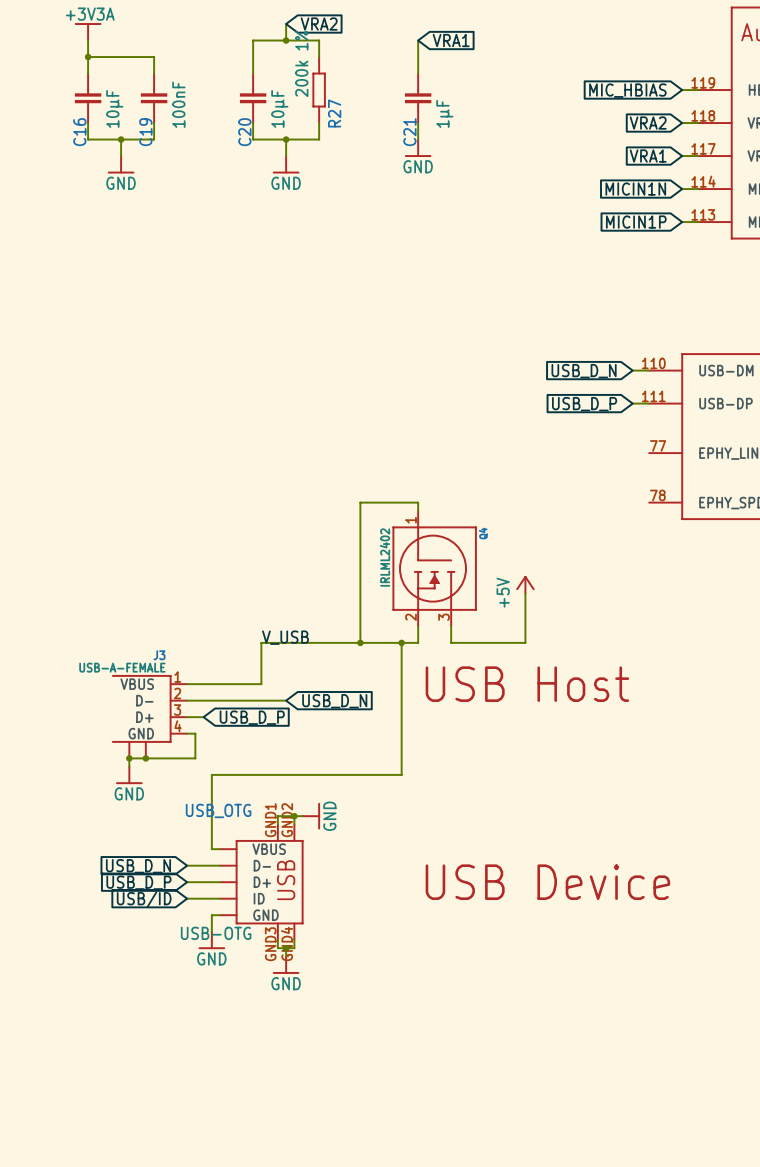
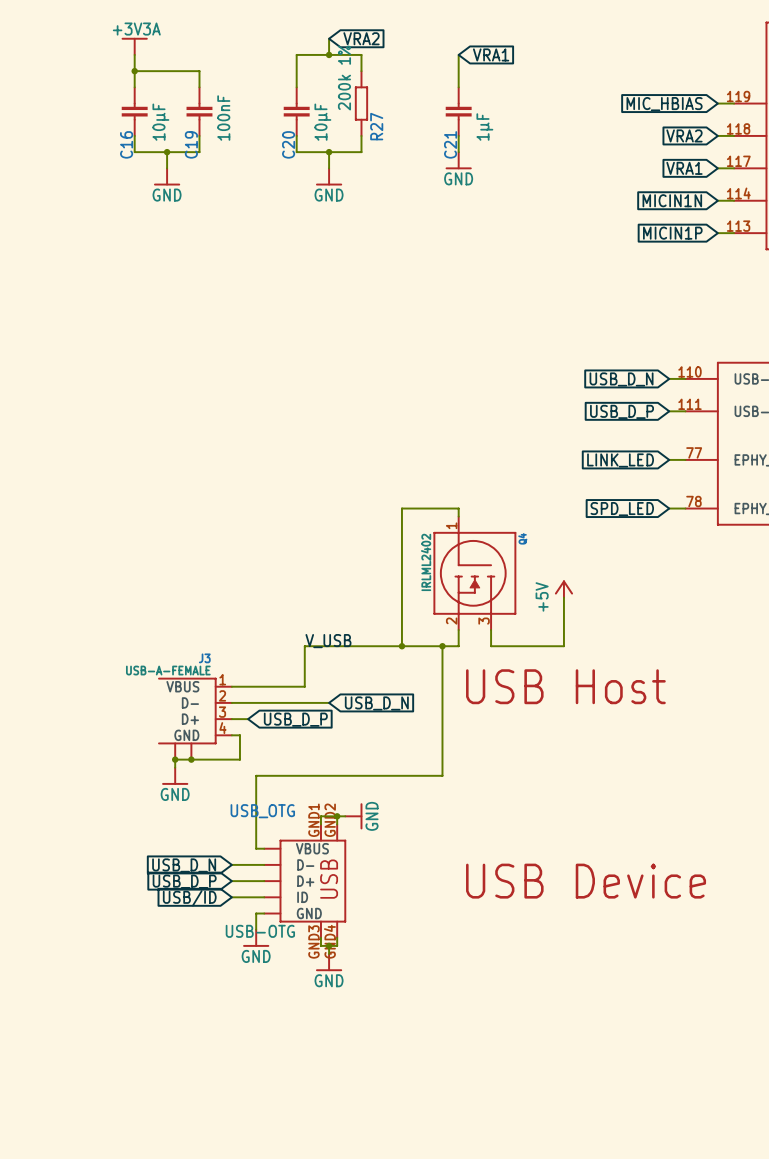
global label: none -> LINK_LED (620, 460)
wire: none -> (669, 459) (685, 459)
wire: none -> (669, 508) (685, 508)
global label: none -> SPD_LED (622, 509)

